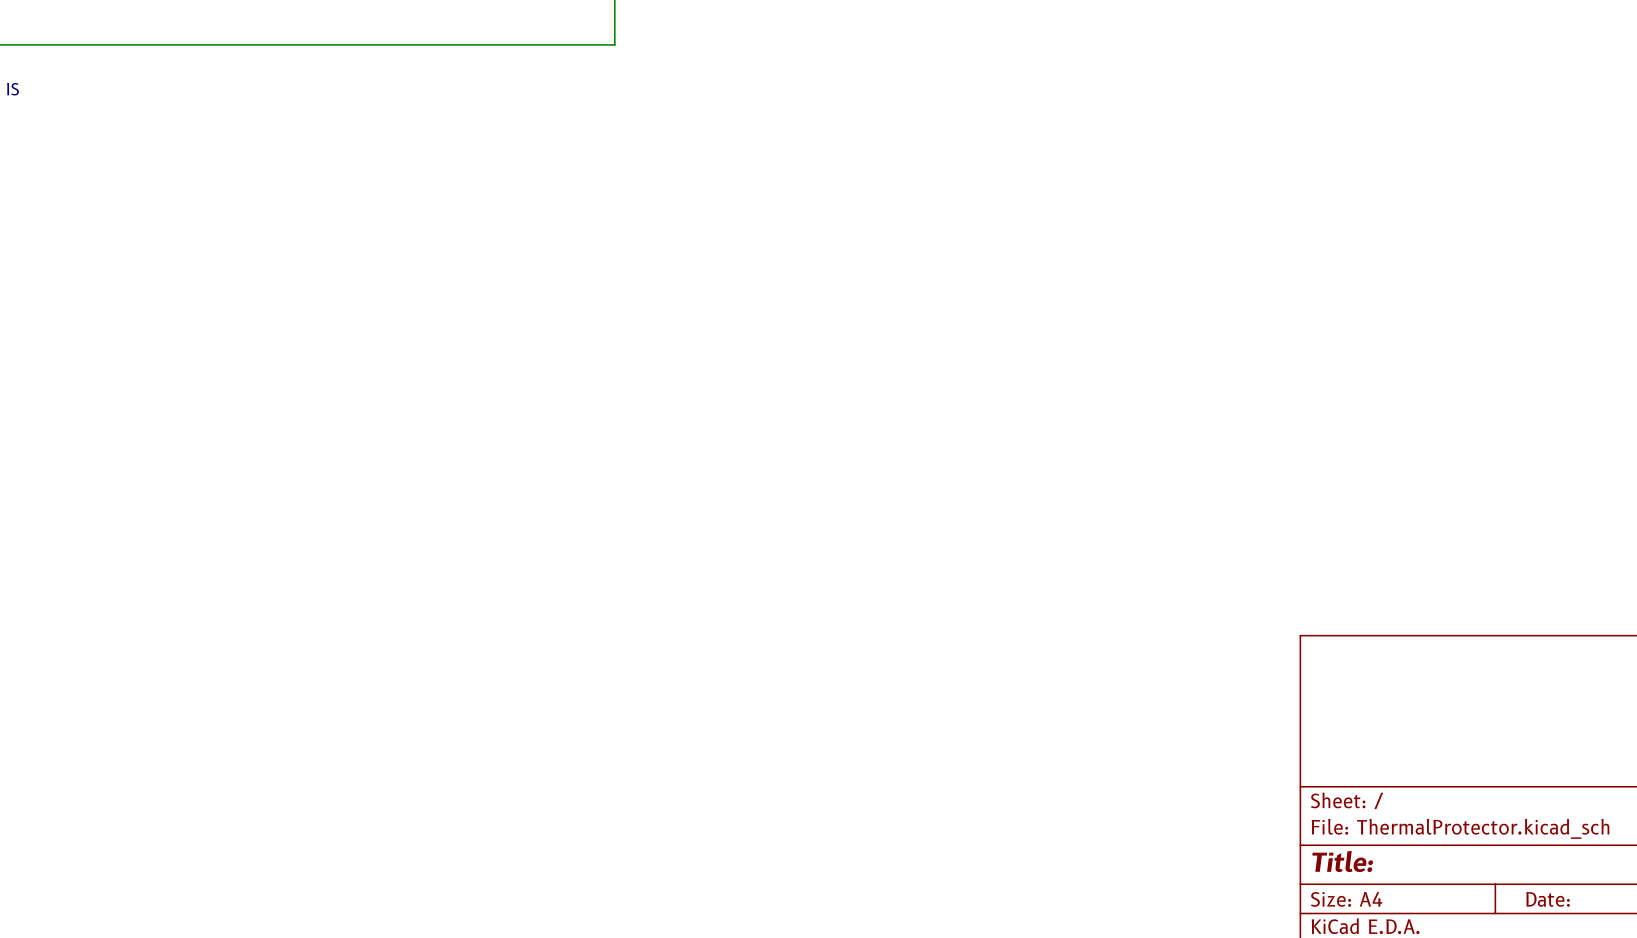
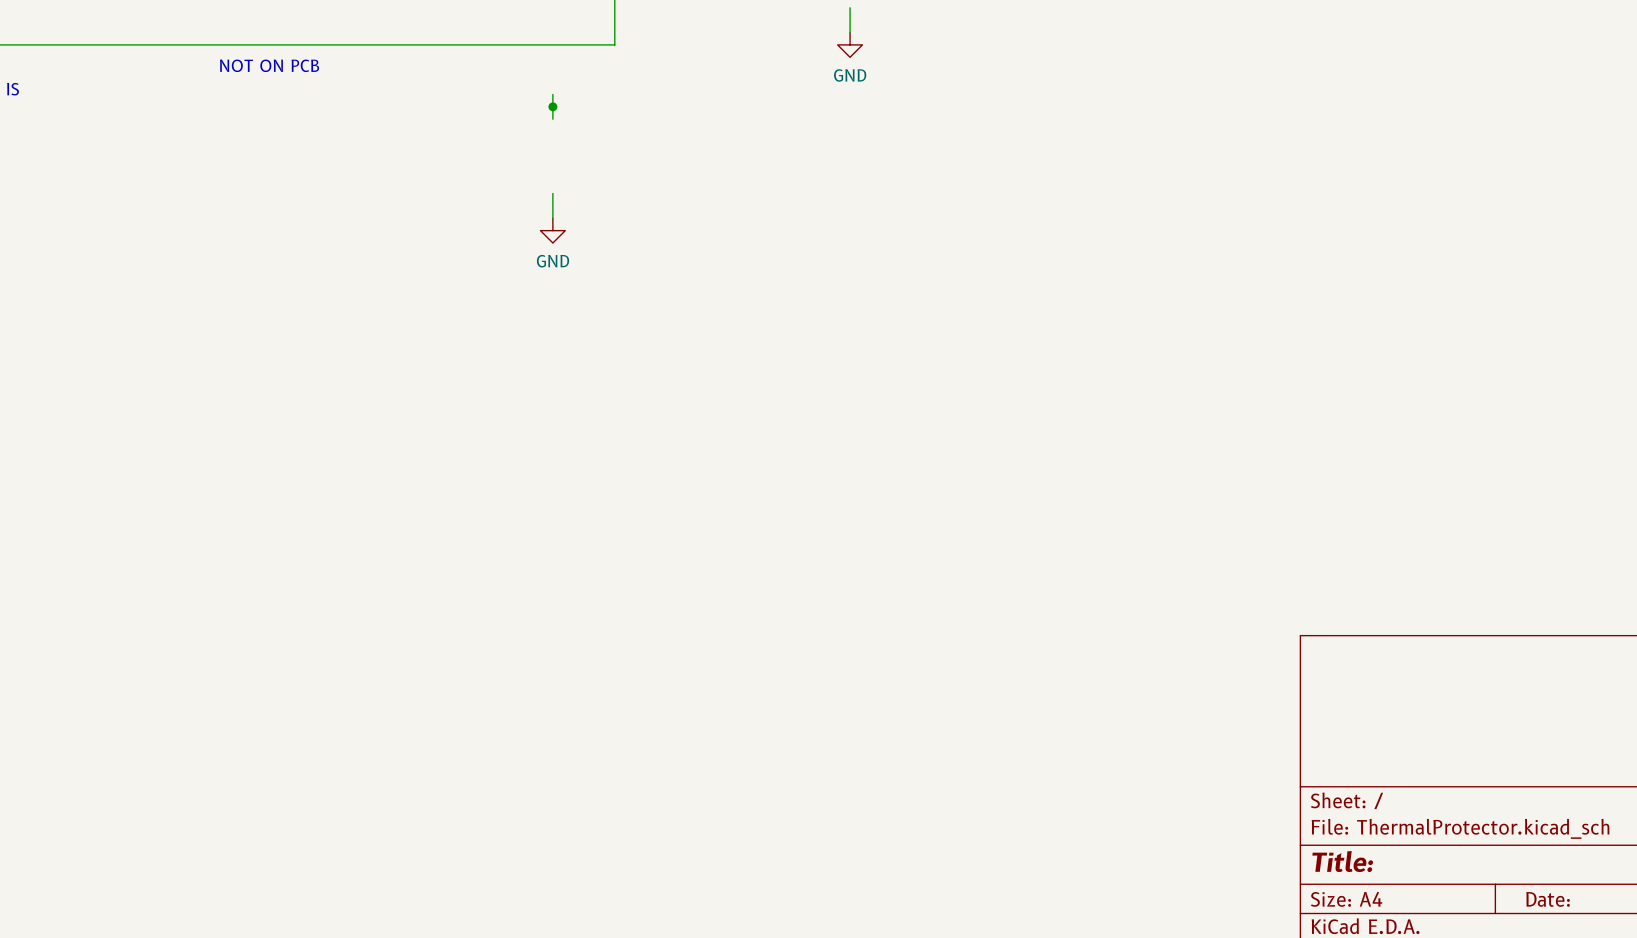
wire: none -> (850, 7) (850, 32)
power symbol: none -> GND (850, 44)
text: none -> NOT ON PCB (269, 65)
wire: none -> (552, 94) (552, 119)
junction: none -> (552, 106)
wire: none -> (552, 193) (552, 218)
power symbol: none -> GND (552, 230)

